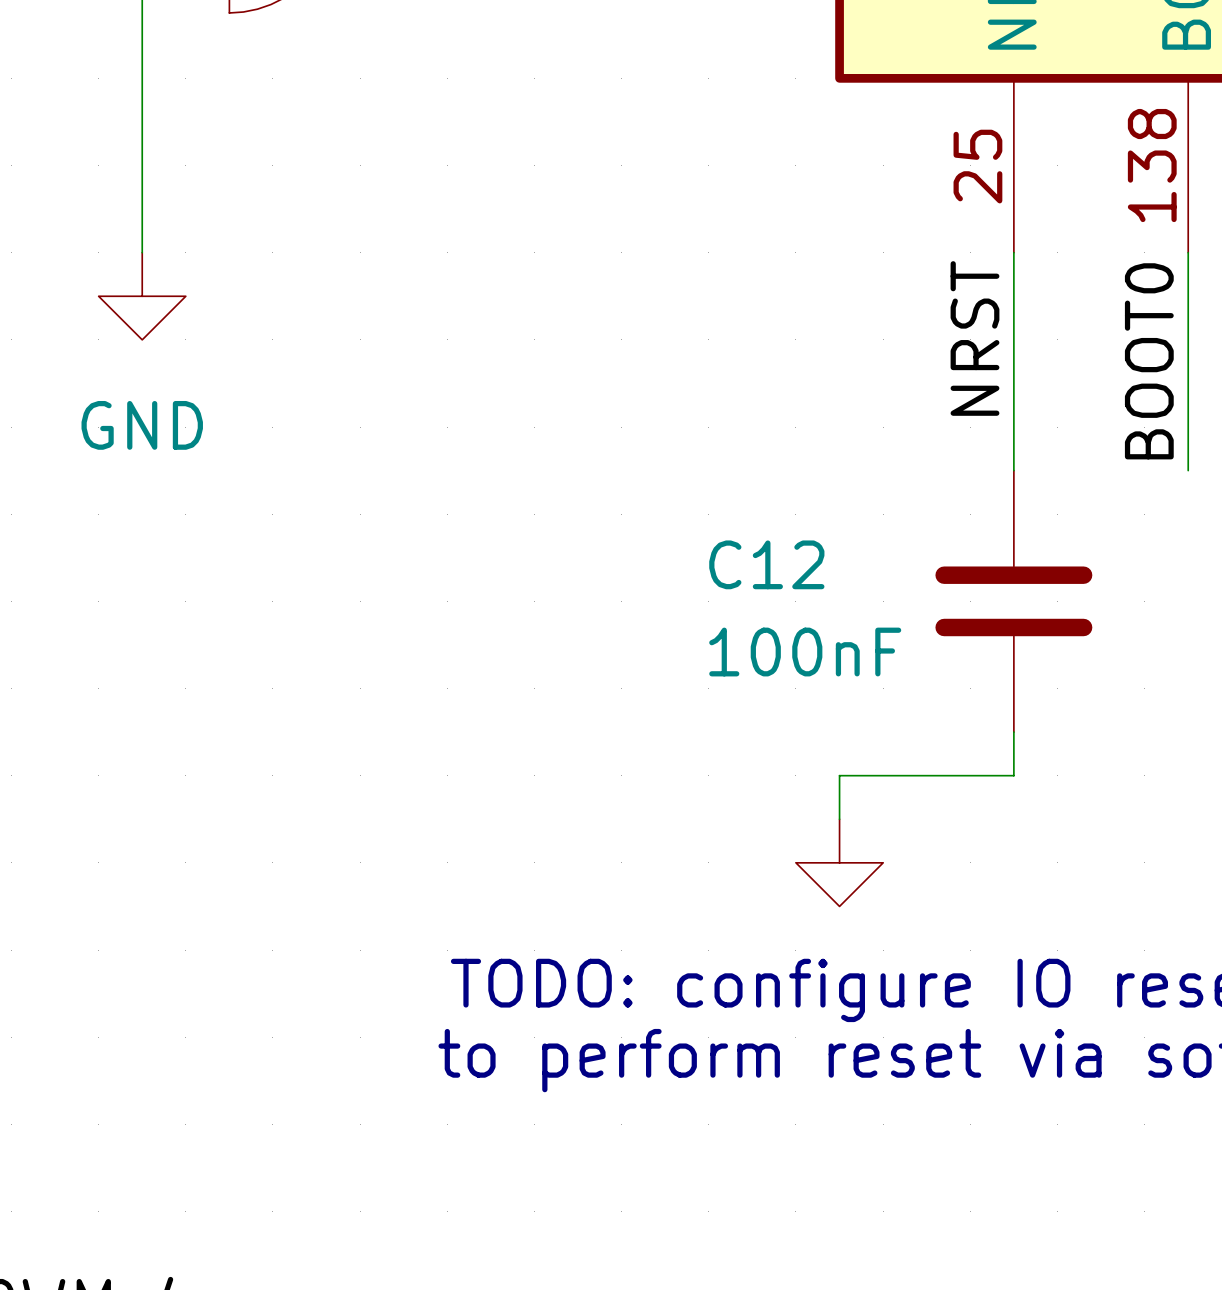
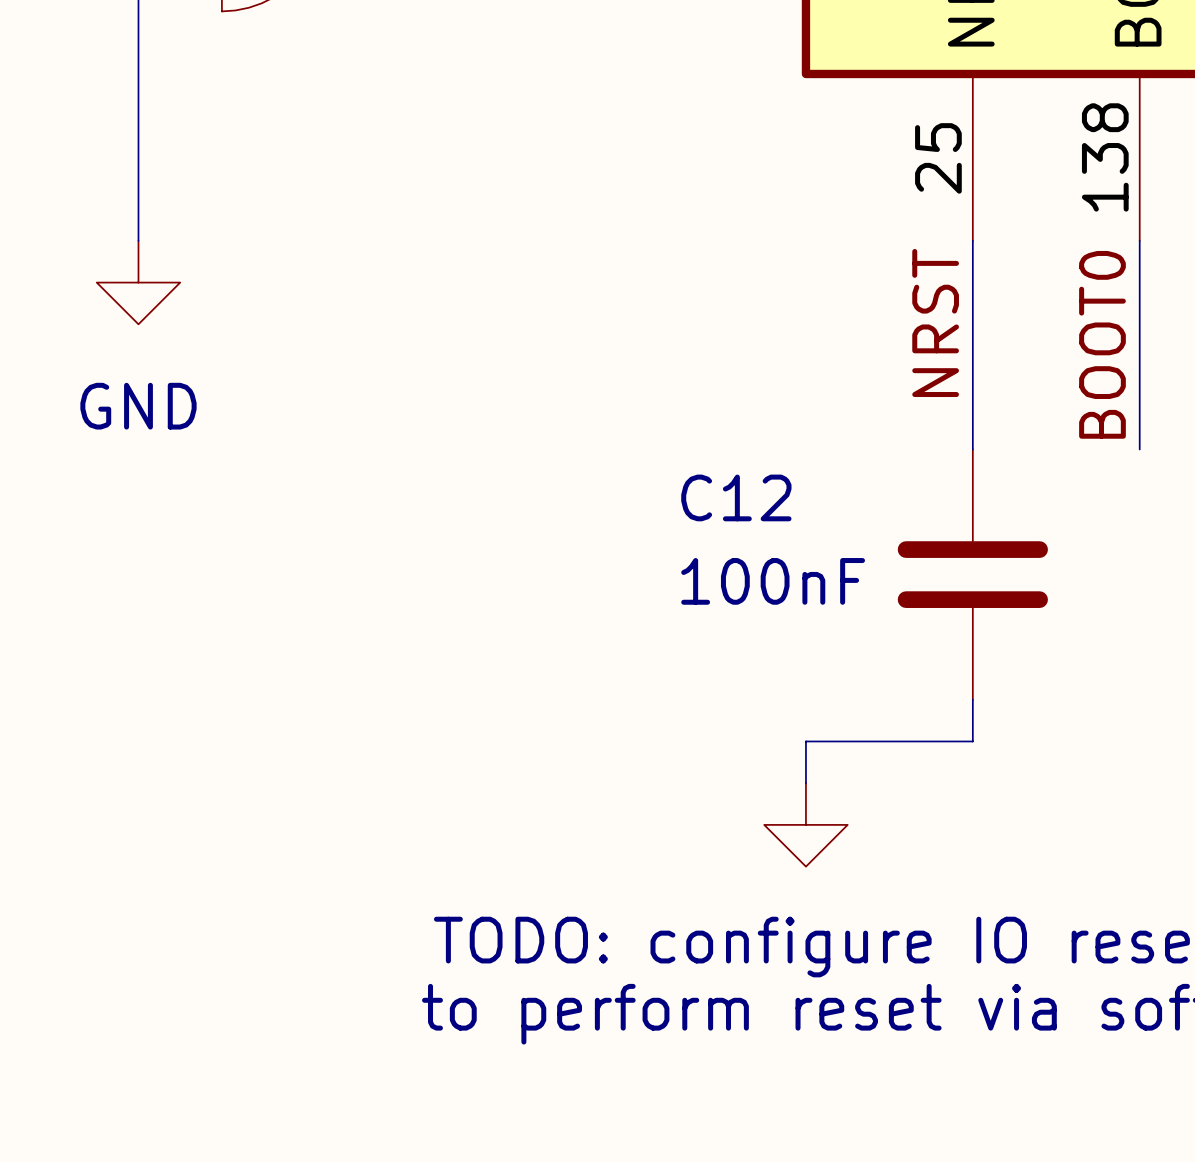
C12 name position: C12 (766, 564) -> C12 (736, 497)
C12 value position: 100nF (805, 652) -> 100nF (773, 581)

